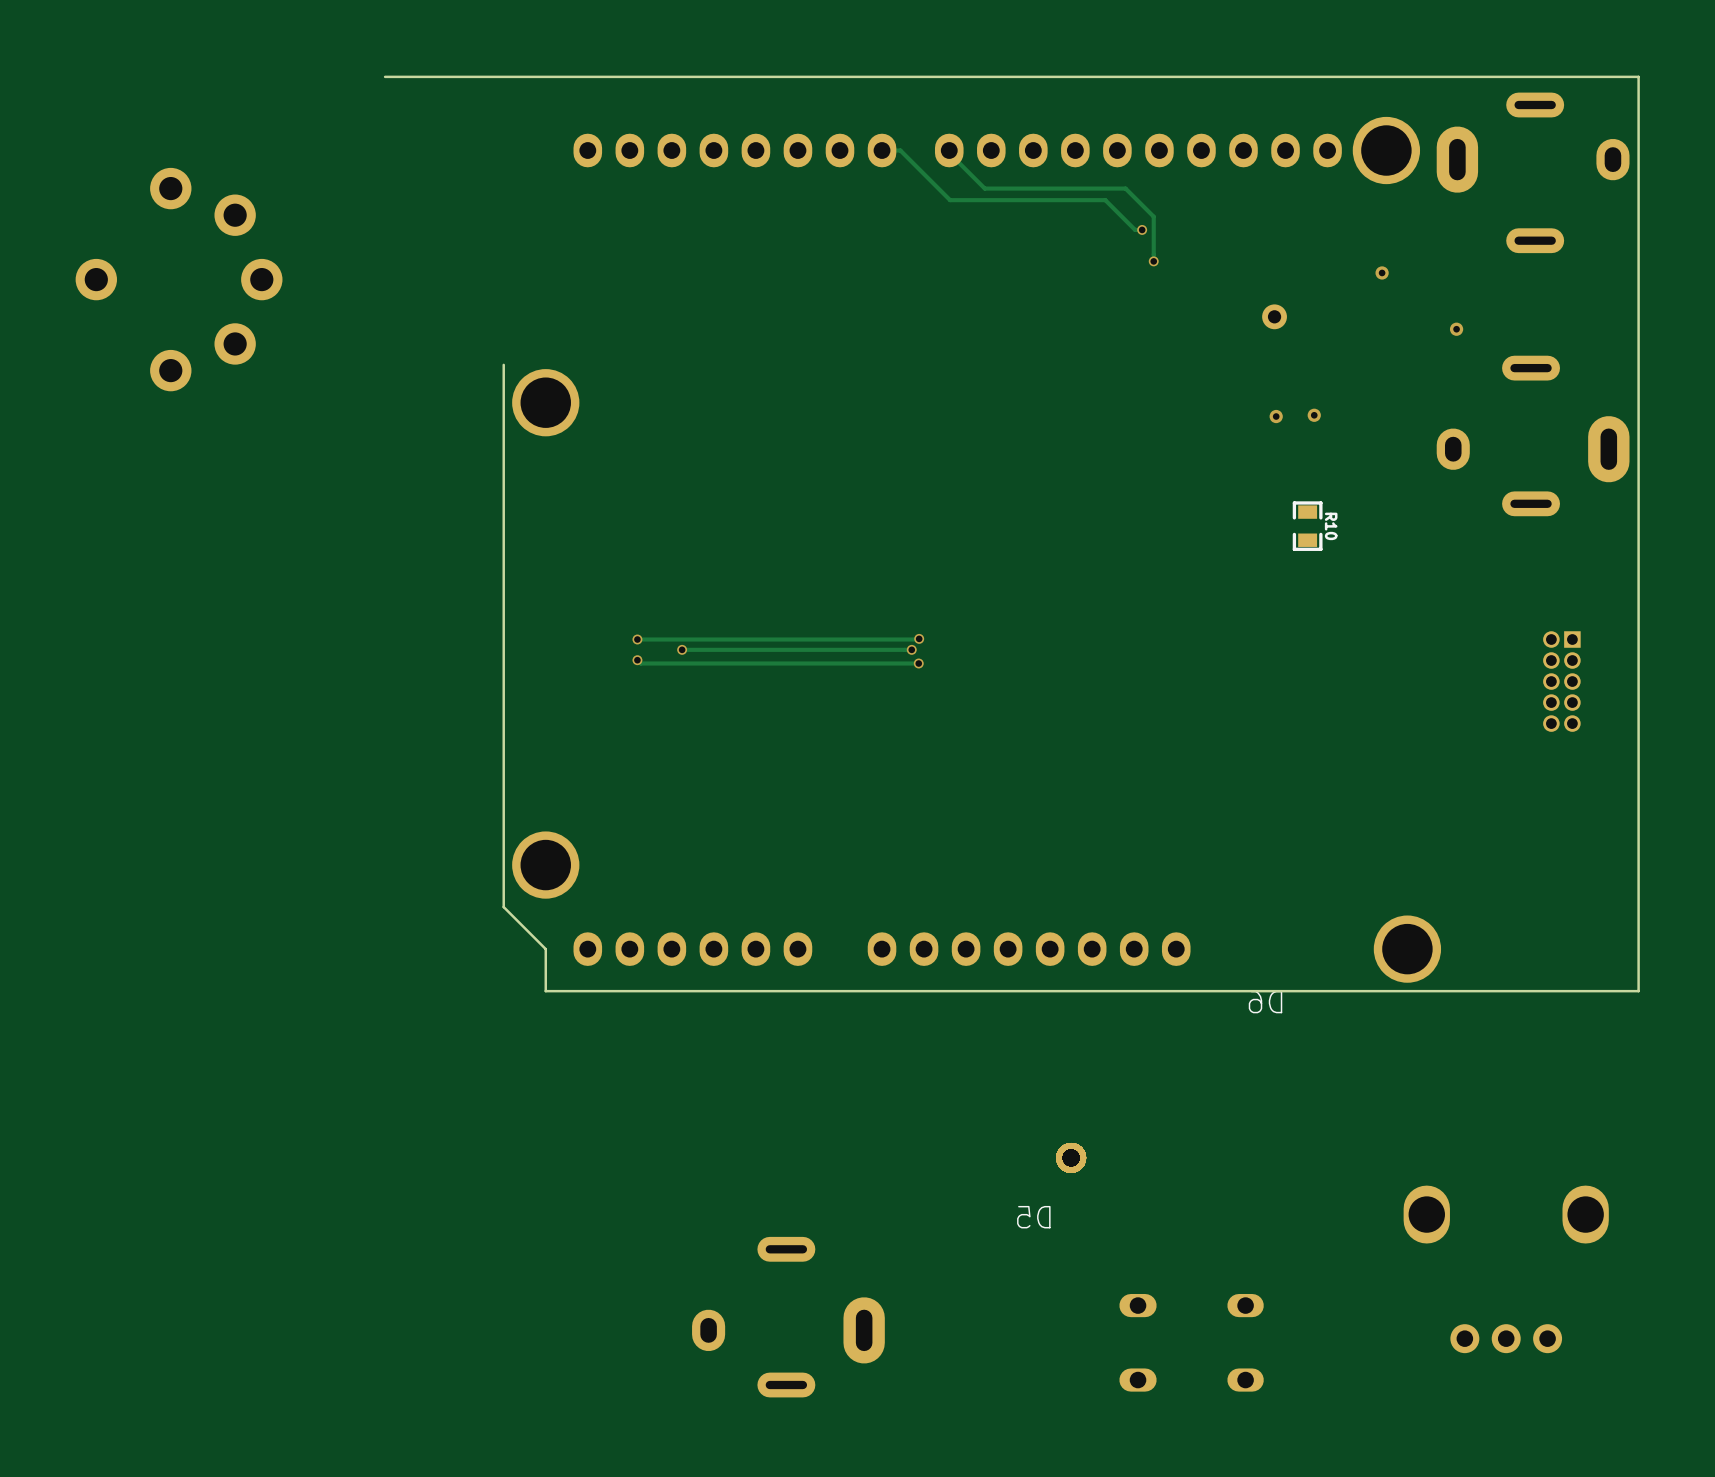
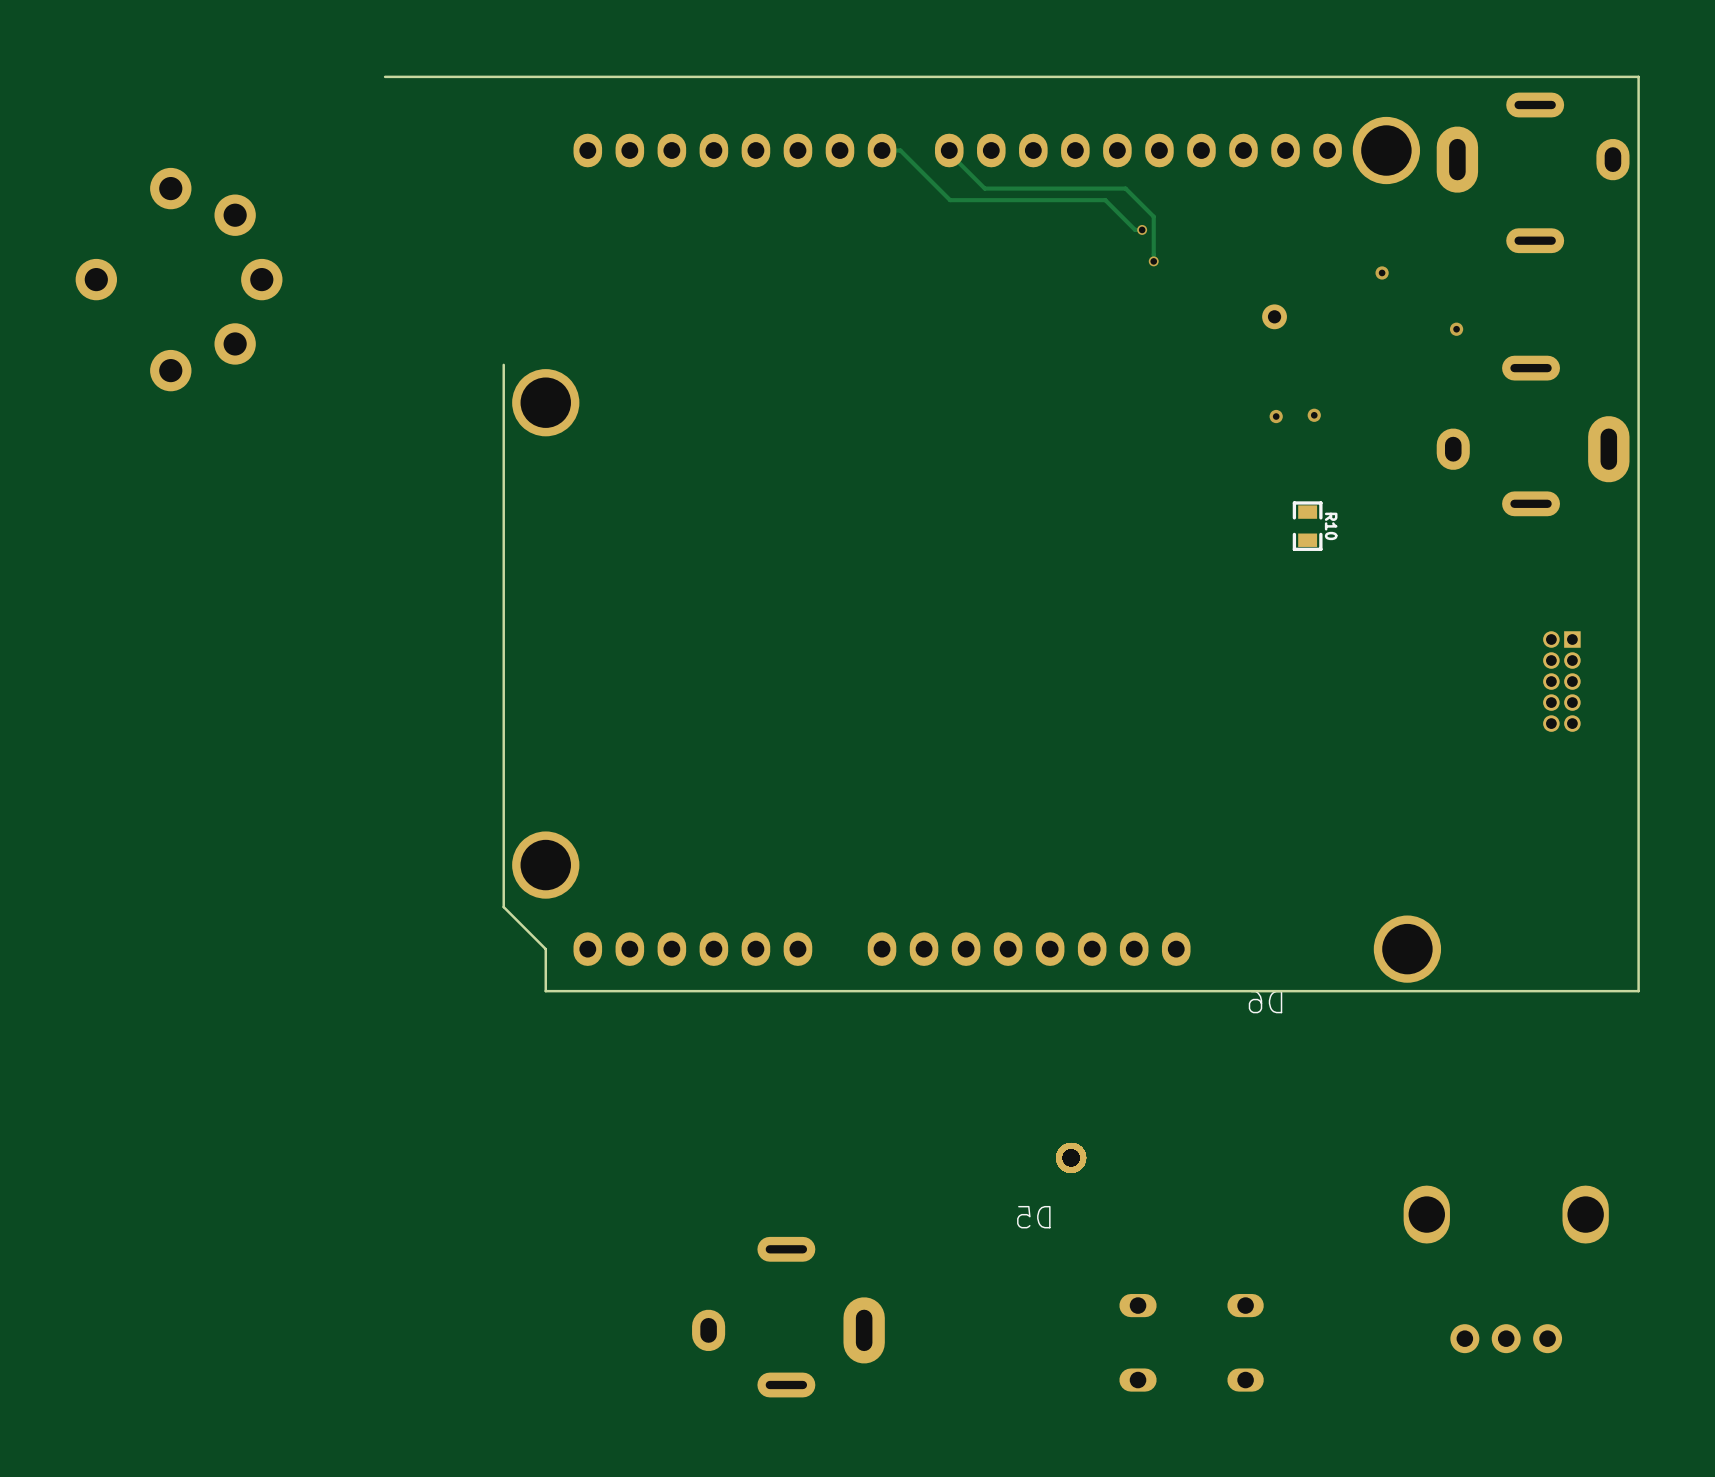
track: (919, 638) (637, 639) -> none
via: (919, 638) -> none
via: (637, 639) -> none
via: (682, 649) -> none
track: (911, 649) (682, 649) -> none
via: (911, 649) -> none
track: (637, 660) (640, 663) (918, 663) -> none
via: (637, 660) -> none
via: (918, 663) -> none

